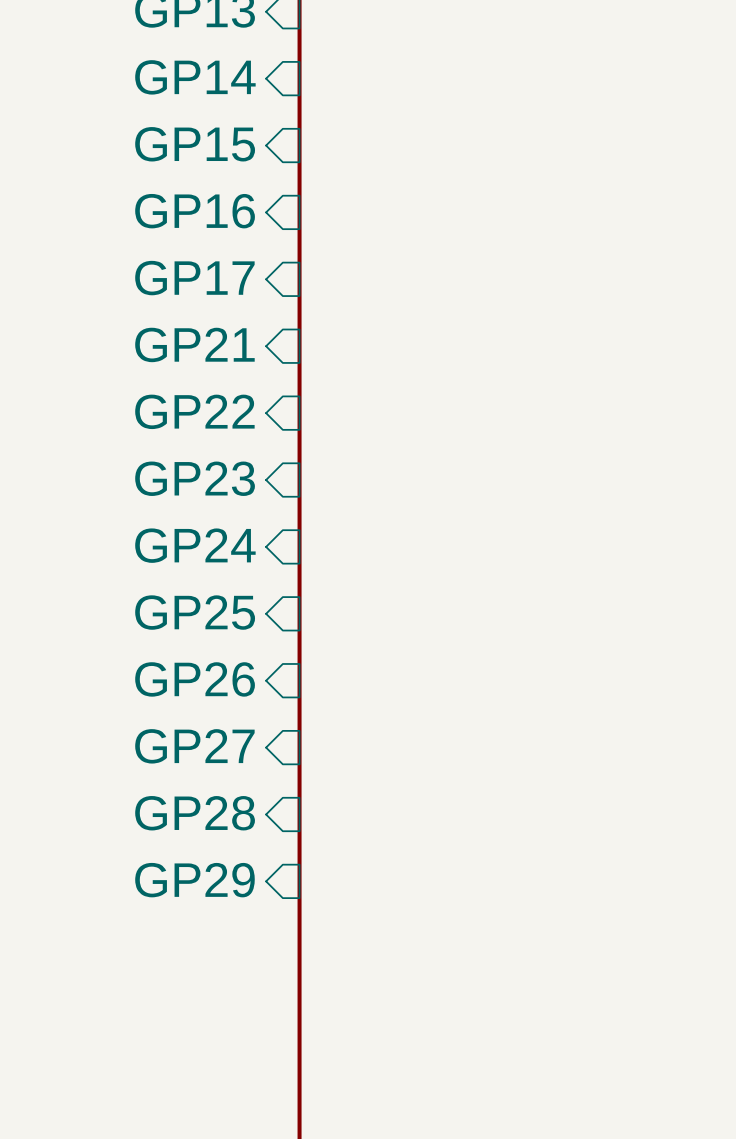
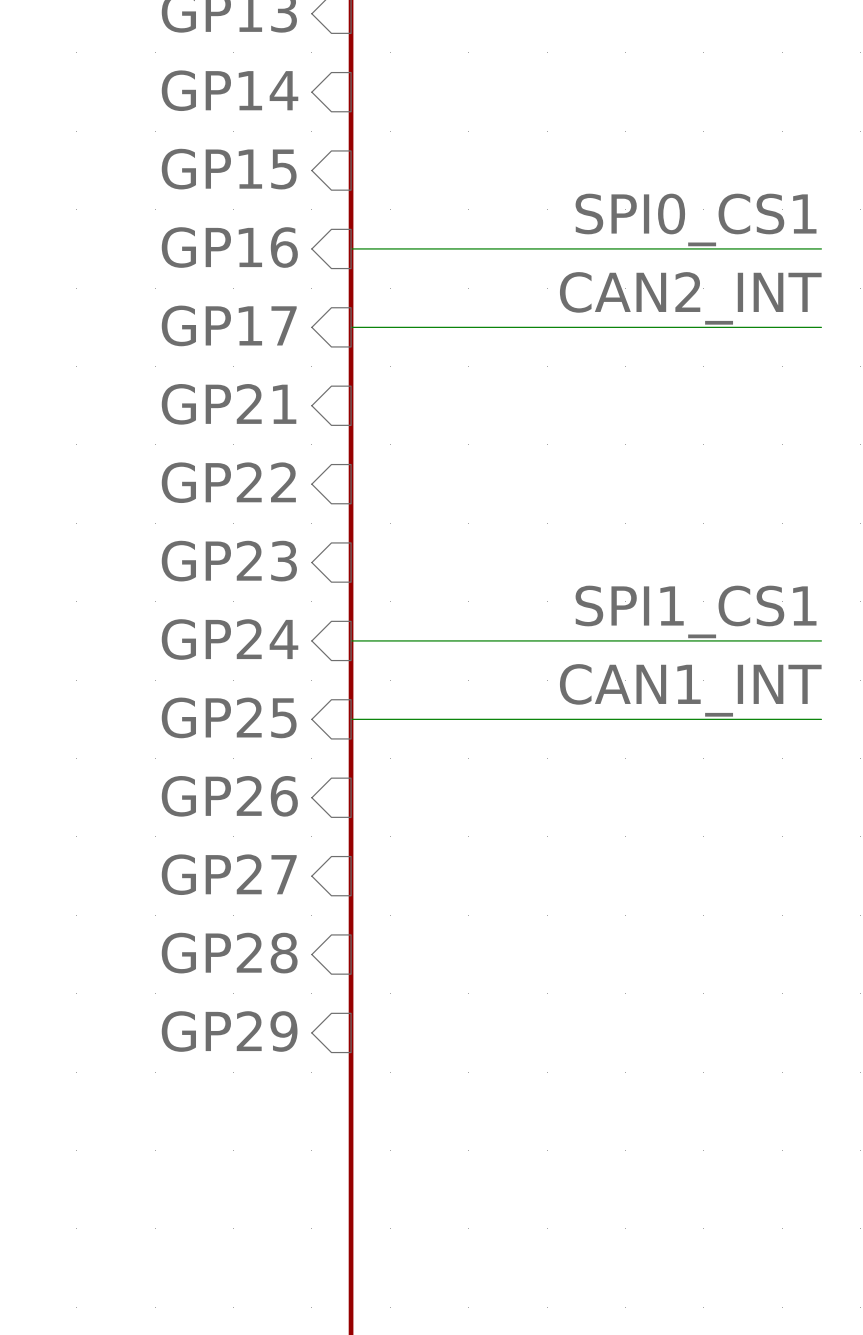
label: none -> SPI0_CS1 (696, 219)
wire: none -> (351, 248) (821, 248)
label: none -> CAN2_INT (690, 298)
wire: none -> (351, 327) (821, 327)
label: none -> SPI1_CS1 (696, 611)
wire: none -> (351, 640) (821, 640)
label: none -> CAN1_INT (690, 690)
wire: none -> (351, 719) (821, 719)

